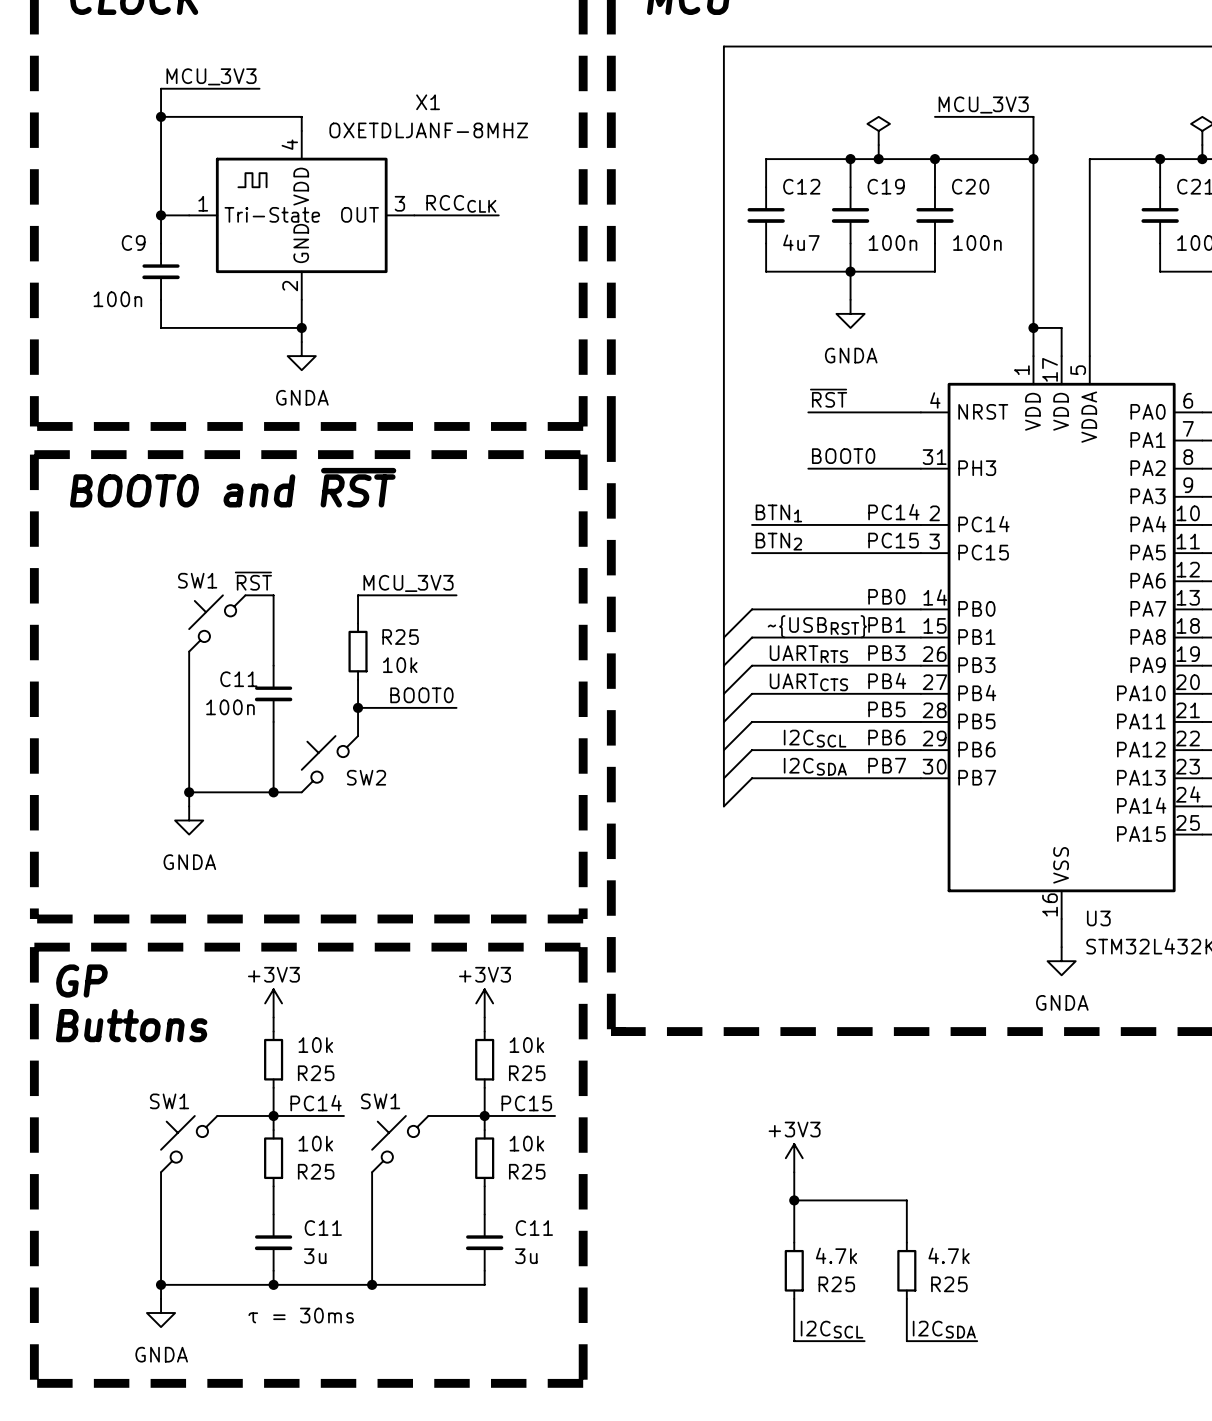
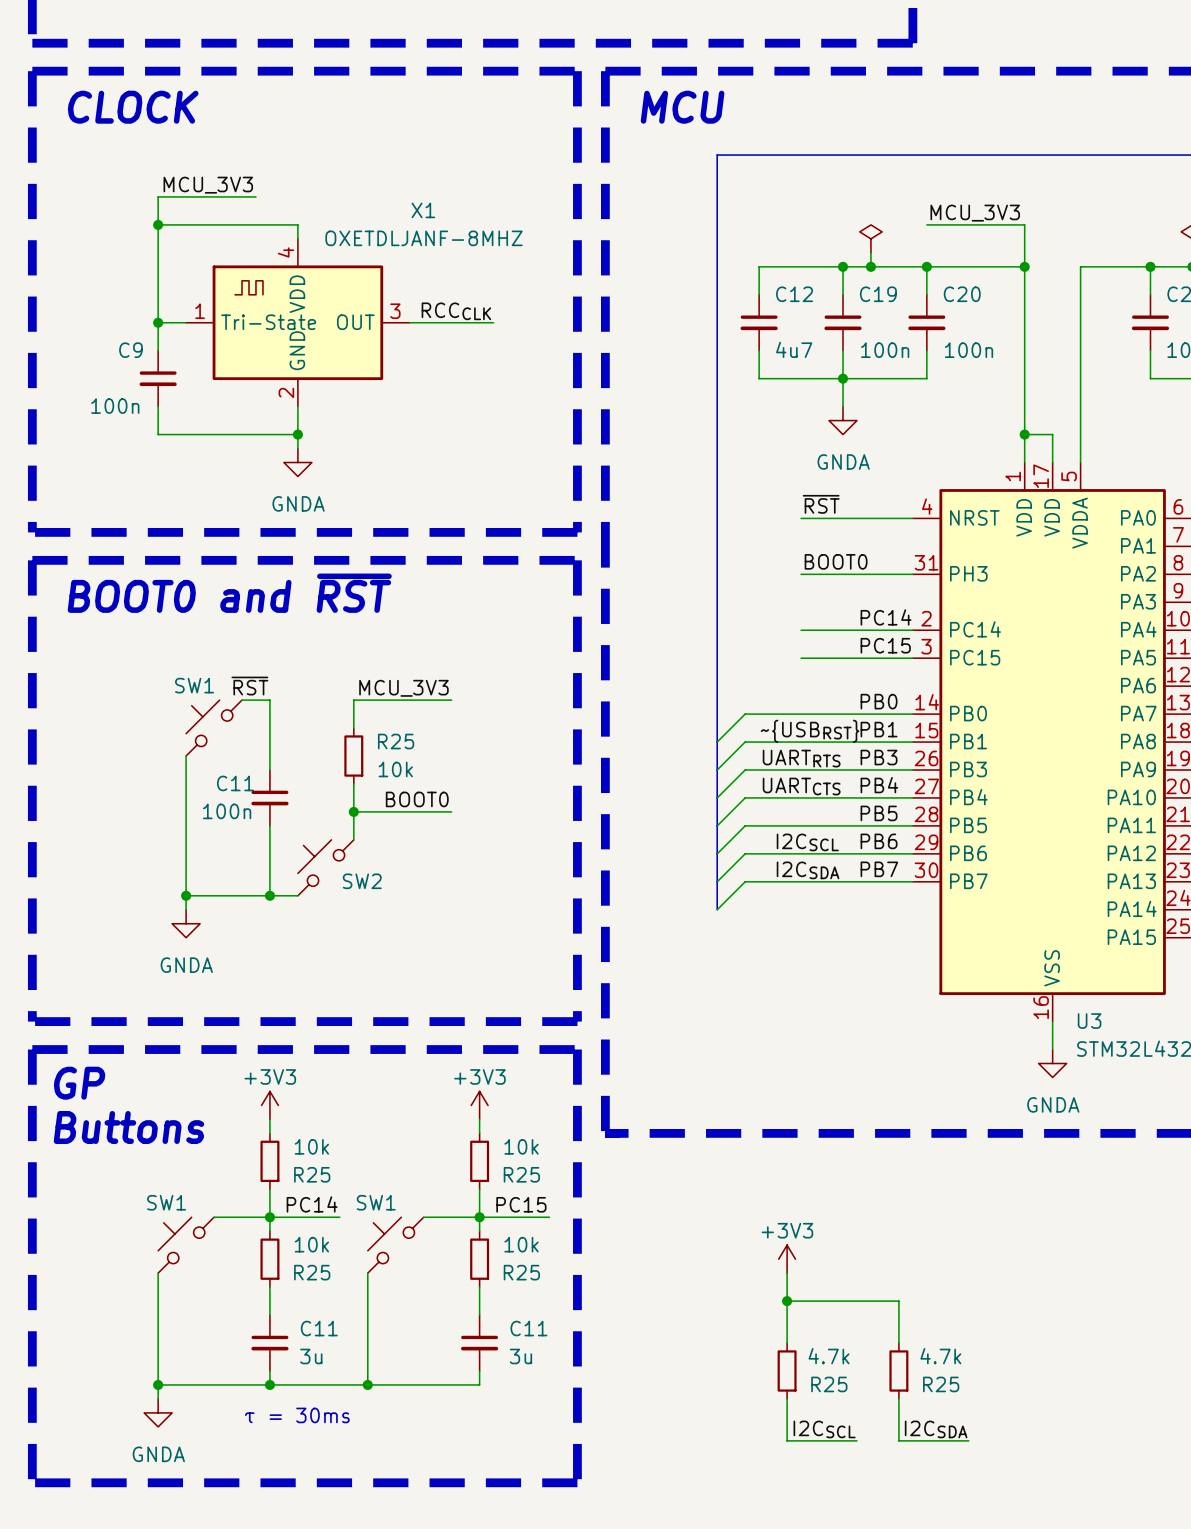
label: BTN1 (778, 513) -> none
wire: (752, 524) (808, 524) -> none
label: BTN2 (778, 541) -> none
wire: (752, 553) (808, 553) -> none

